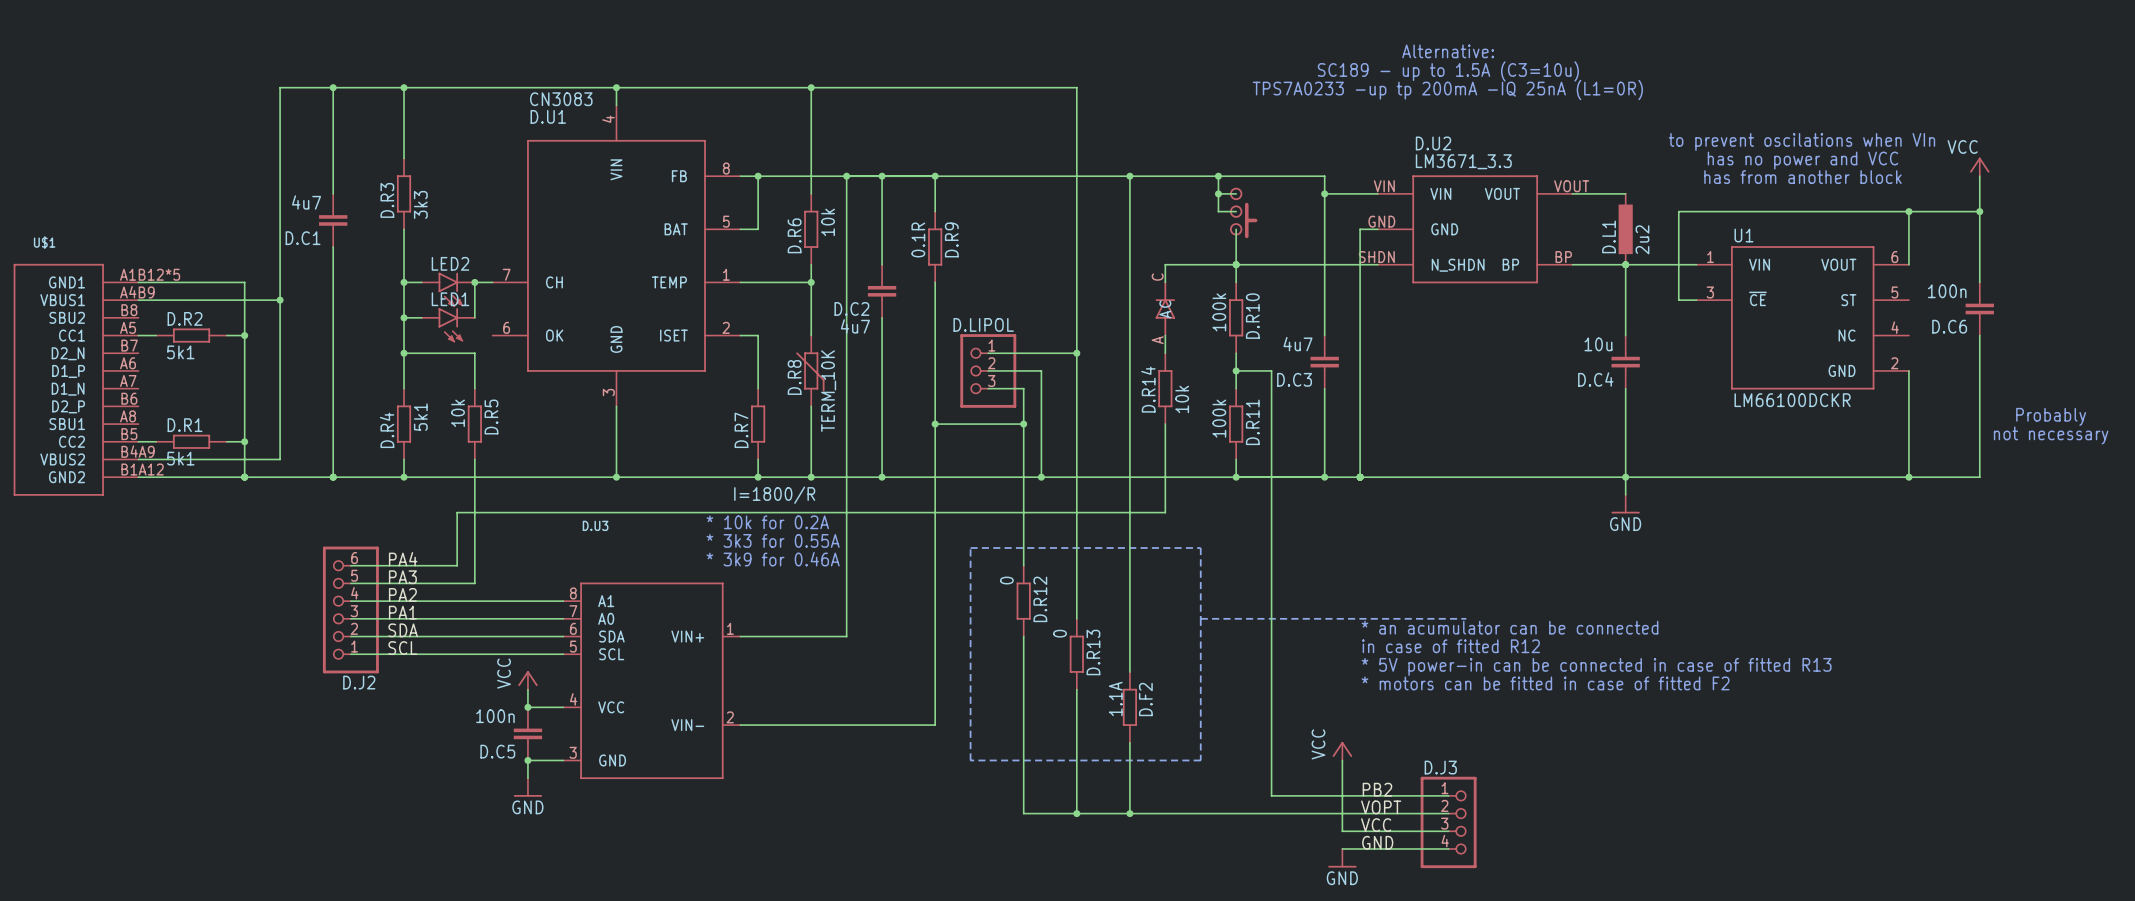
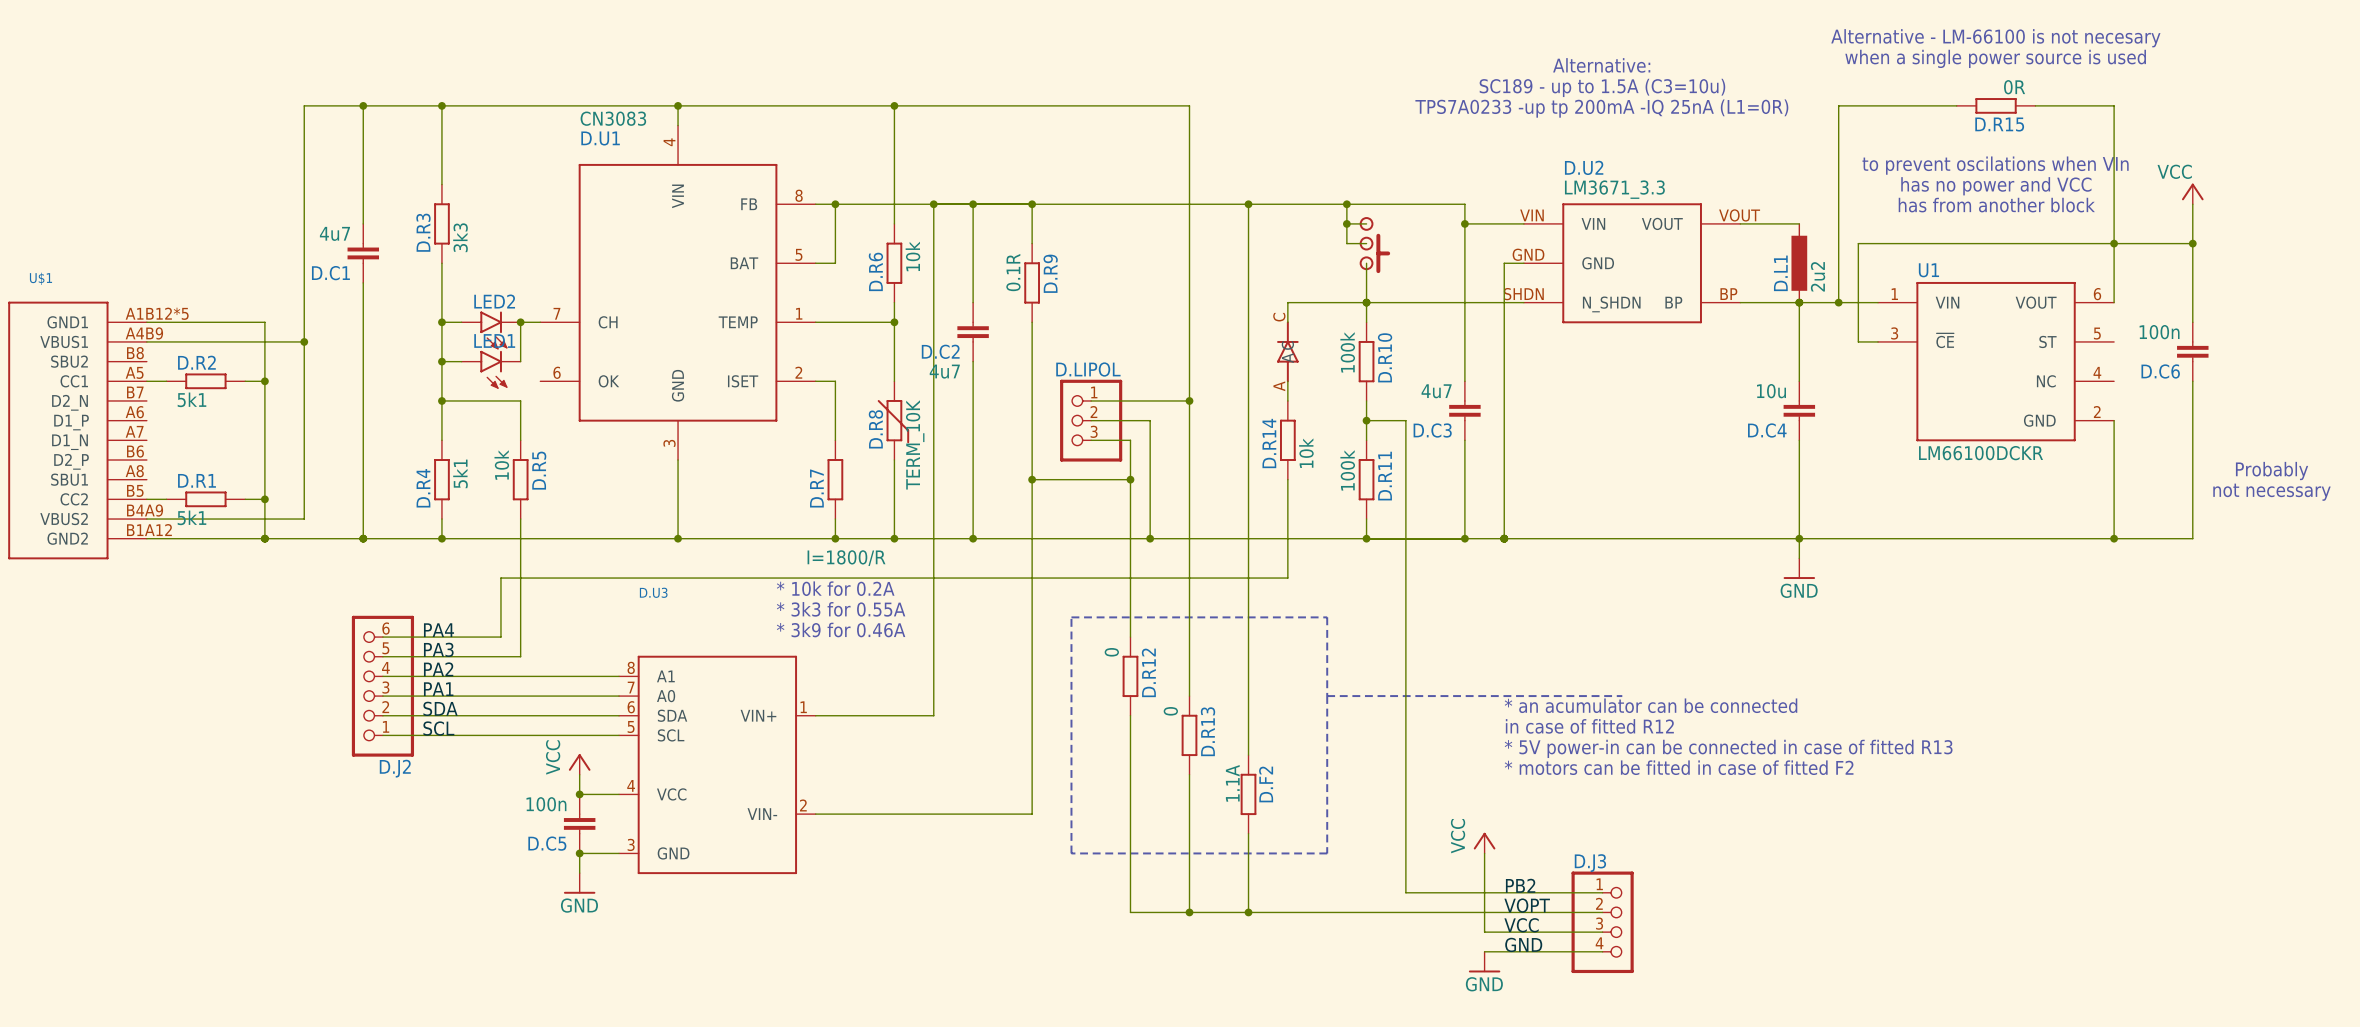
text: none -> Alternative - LM-66100 is not necesary (1995, 38)
text: none -> when a single power source is used (1995, 58)
wire: none -> (1956, 105) (1838, 105) (1838, 302)
D.R15: none -> 0R (1996, 105)
wire: none -> (2035, 105) (2114, 105) (2114, 243)
junction: none -> (1838, 302)

